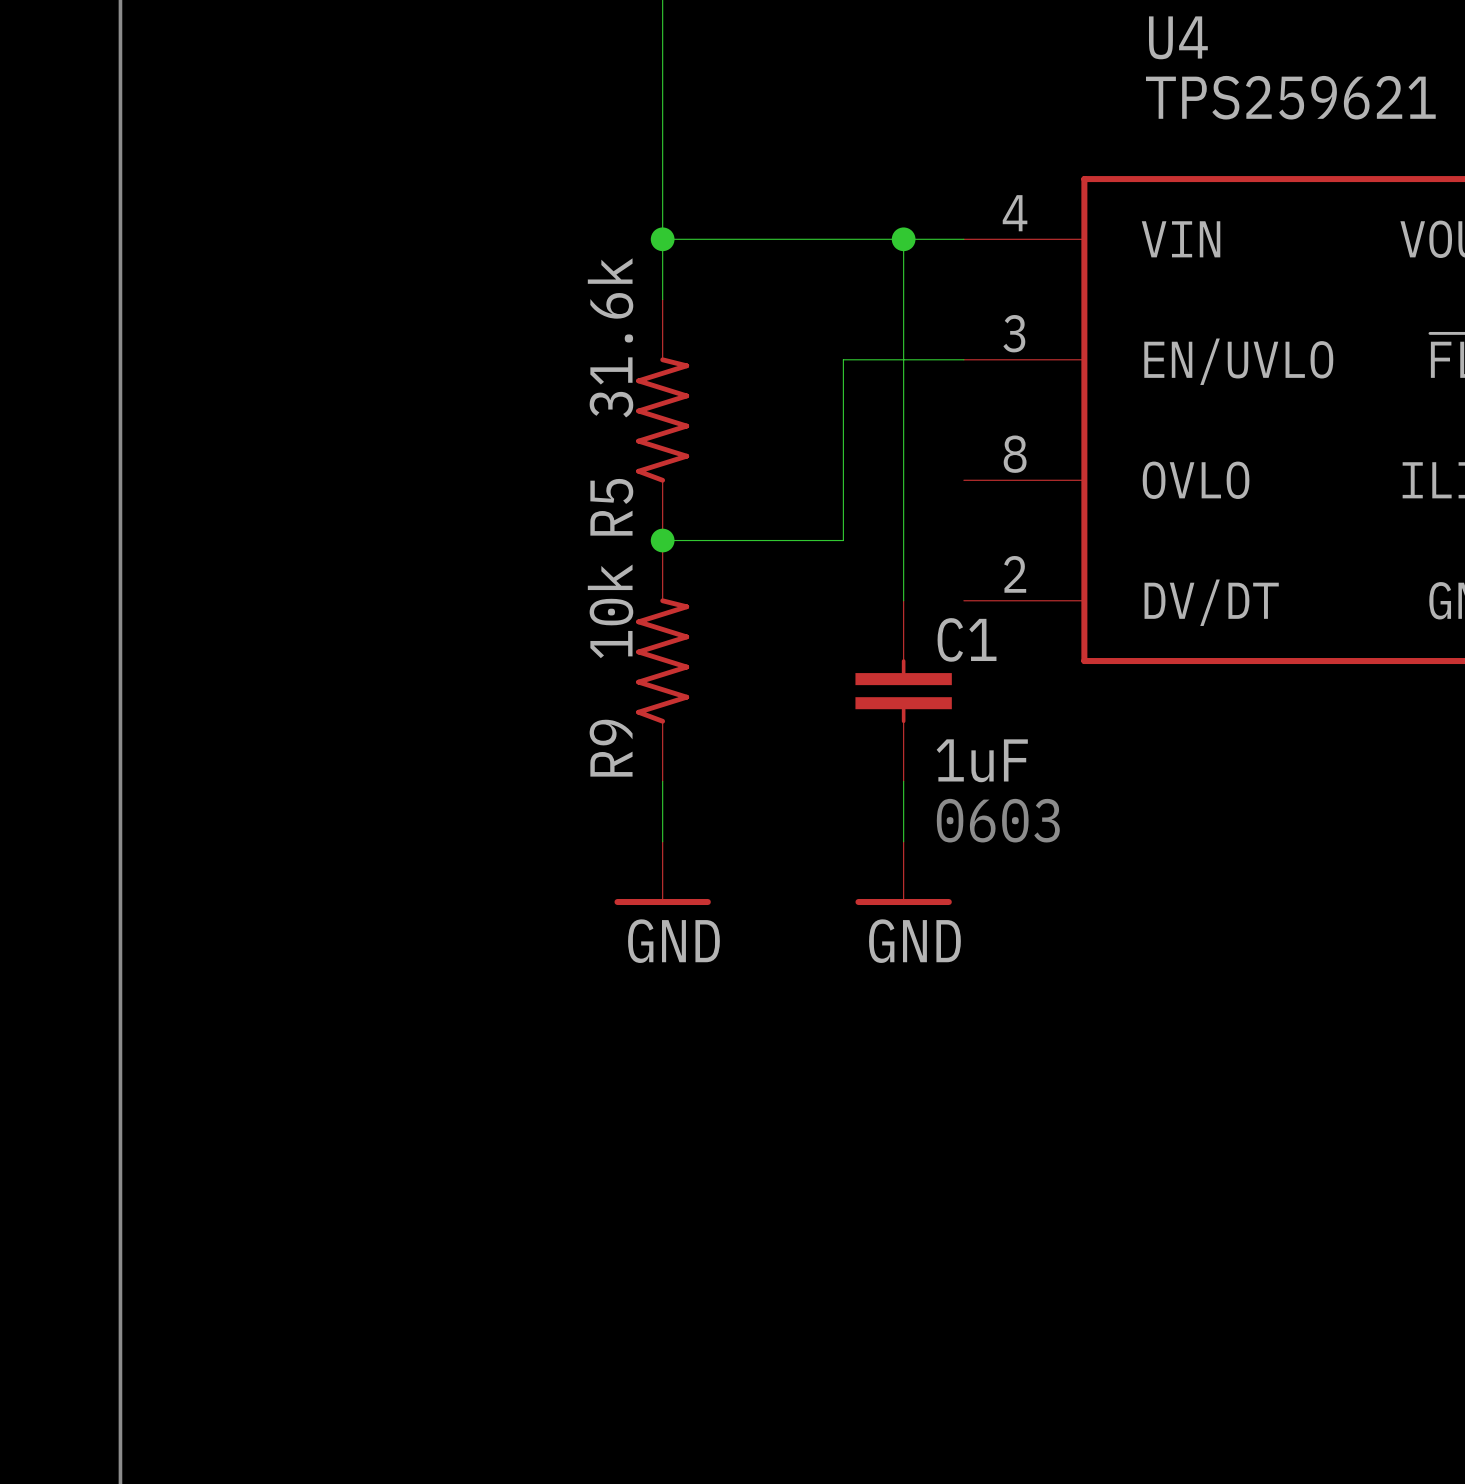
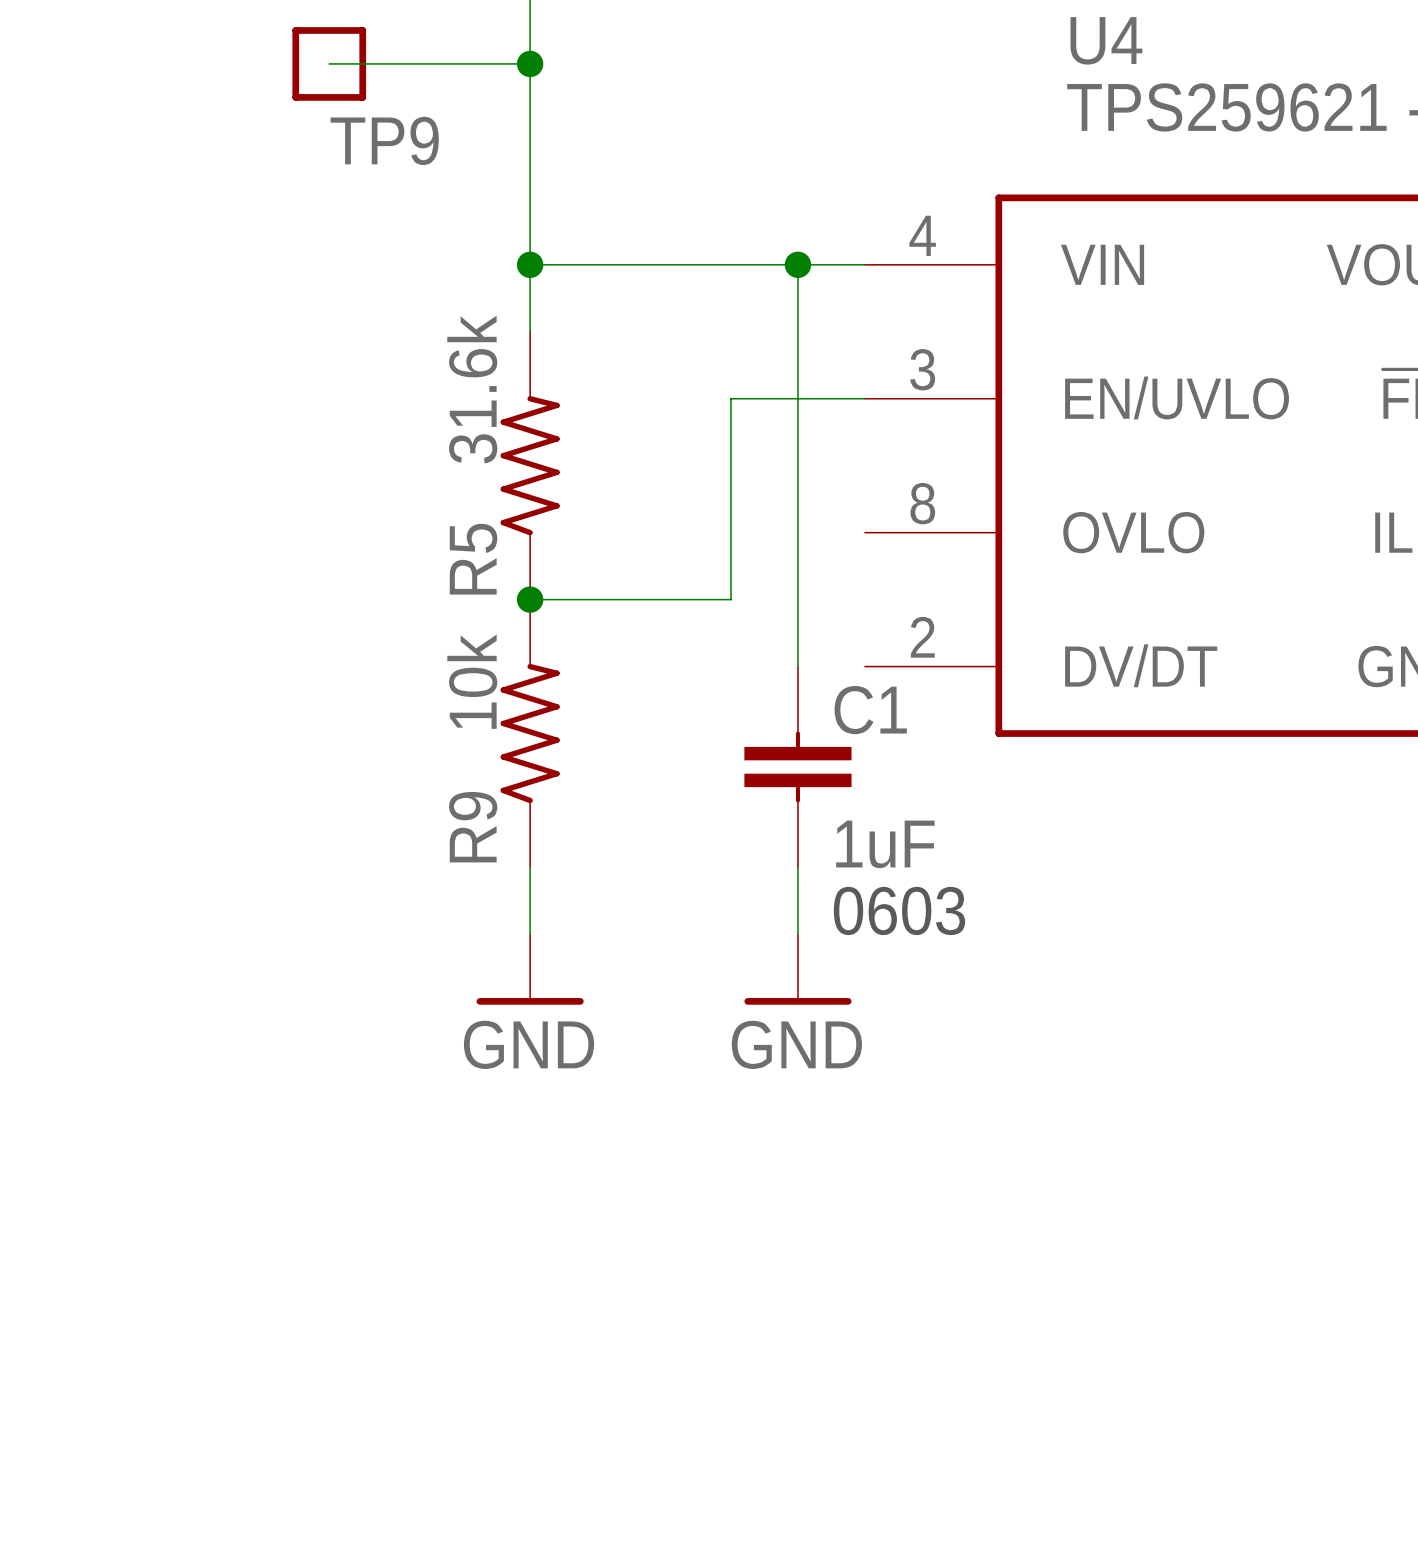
wire: none -> (329, 63) (530, 63)
TP9: none -> (329, 63)
junction: none -> (530, 63)

